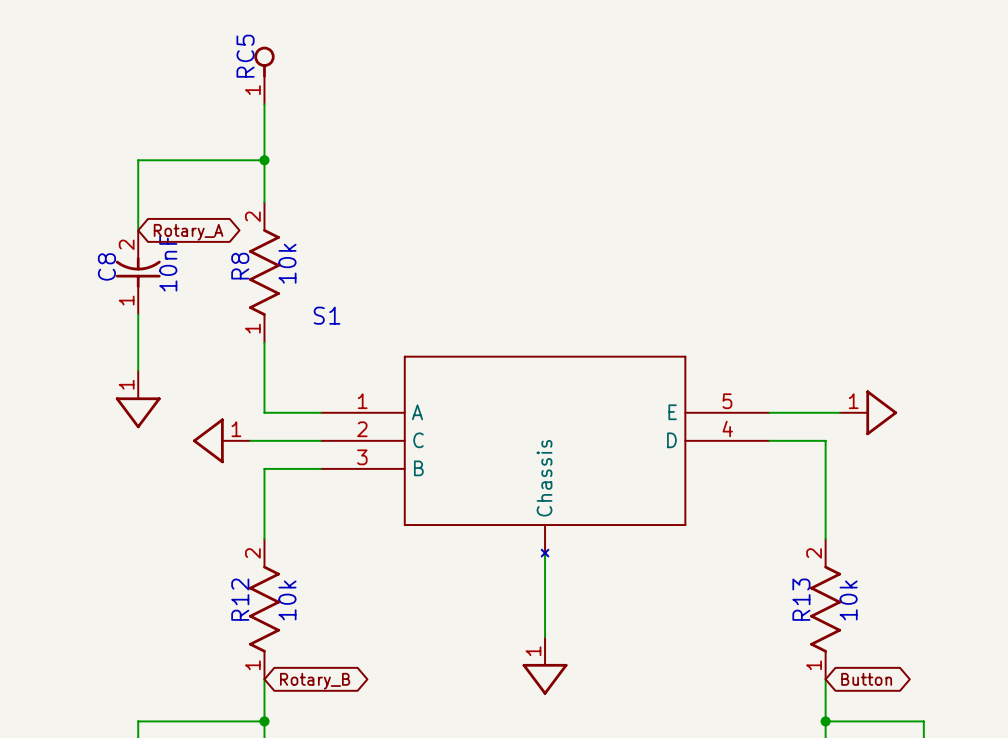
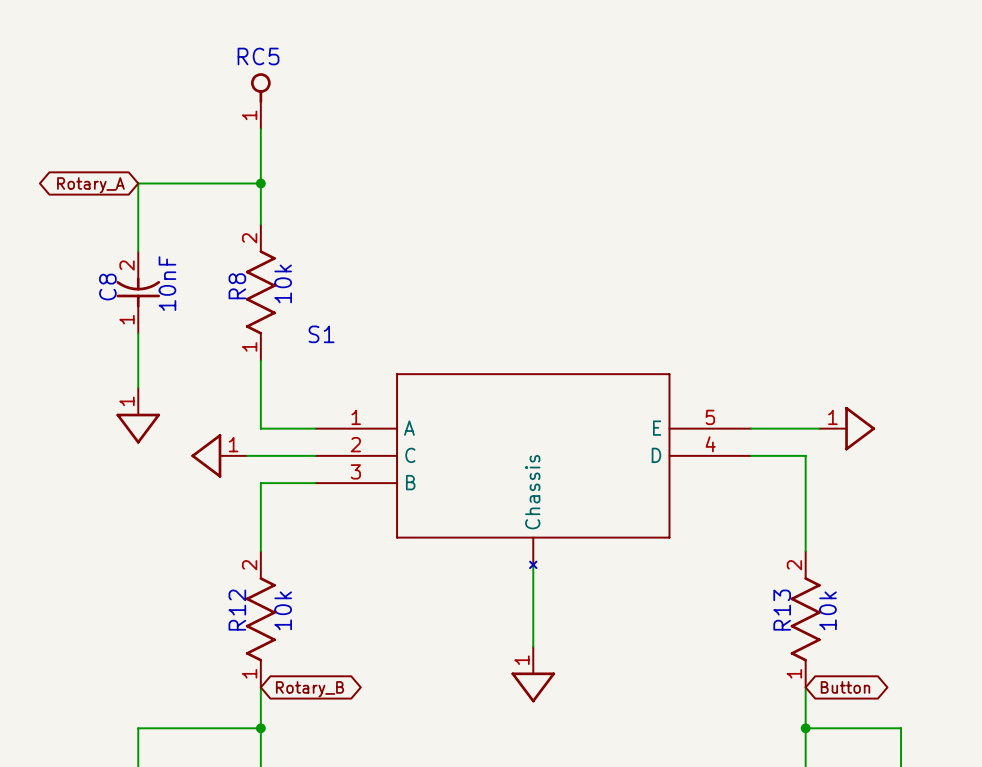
text rotation: 0° (245, 56) -> 90° clockwise (258, 56)
global label rotation: 0° (188, 232) -> 180° (90, 185)
global label position: Rotary_A (188, 232) -> Rotary_A (90, 185)

